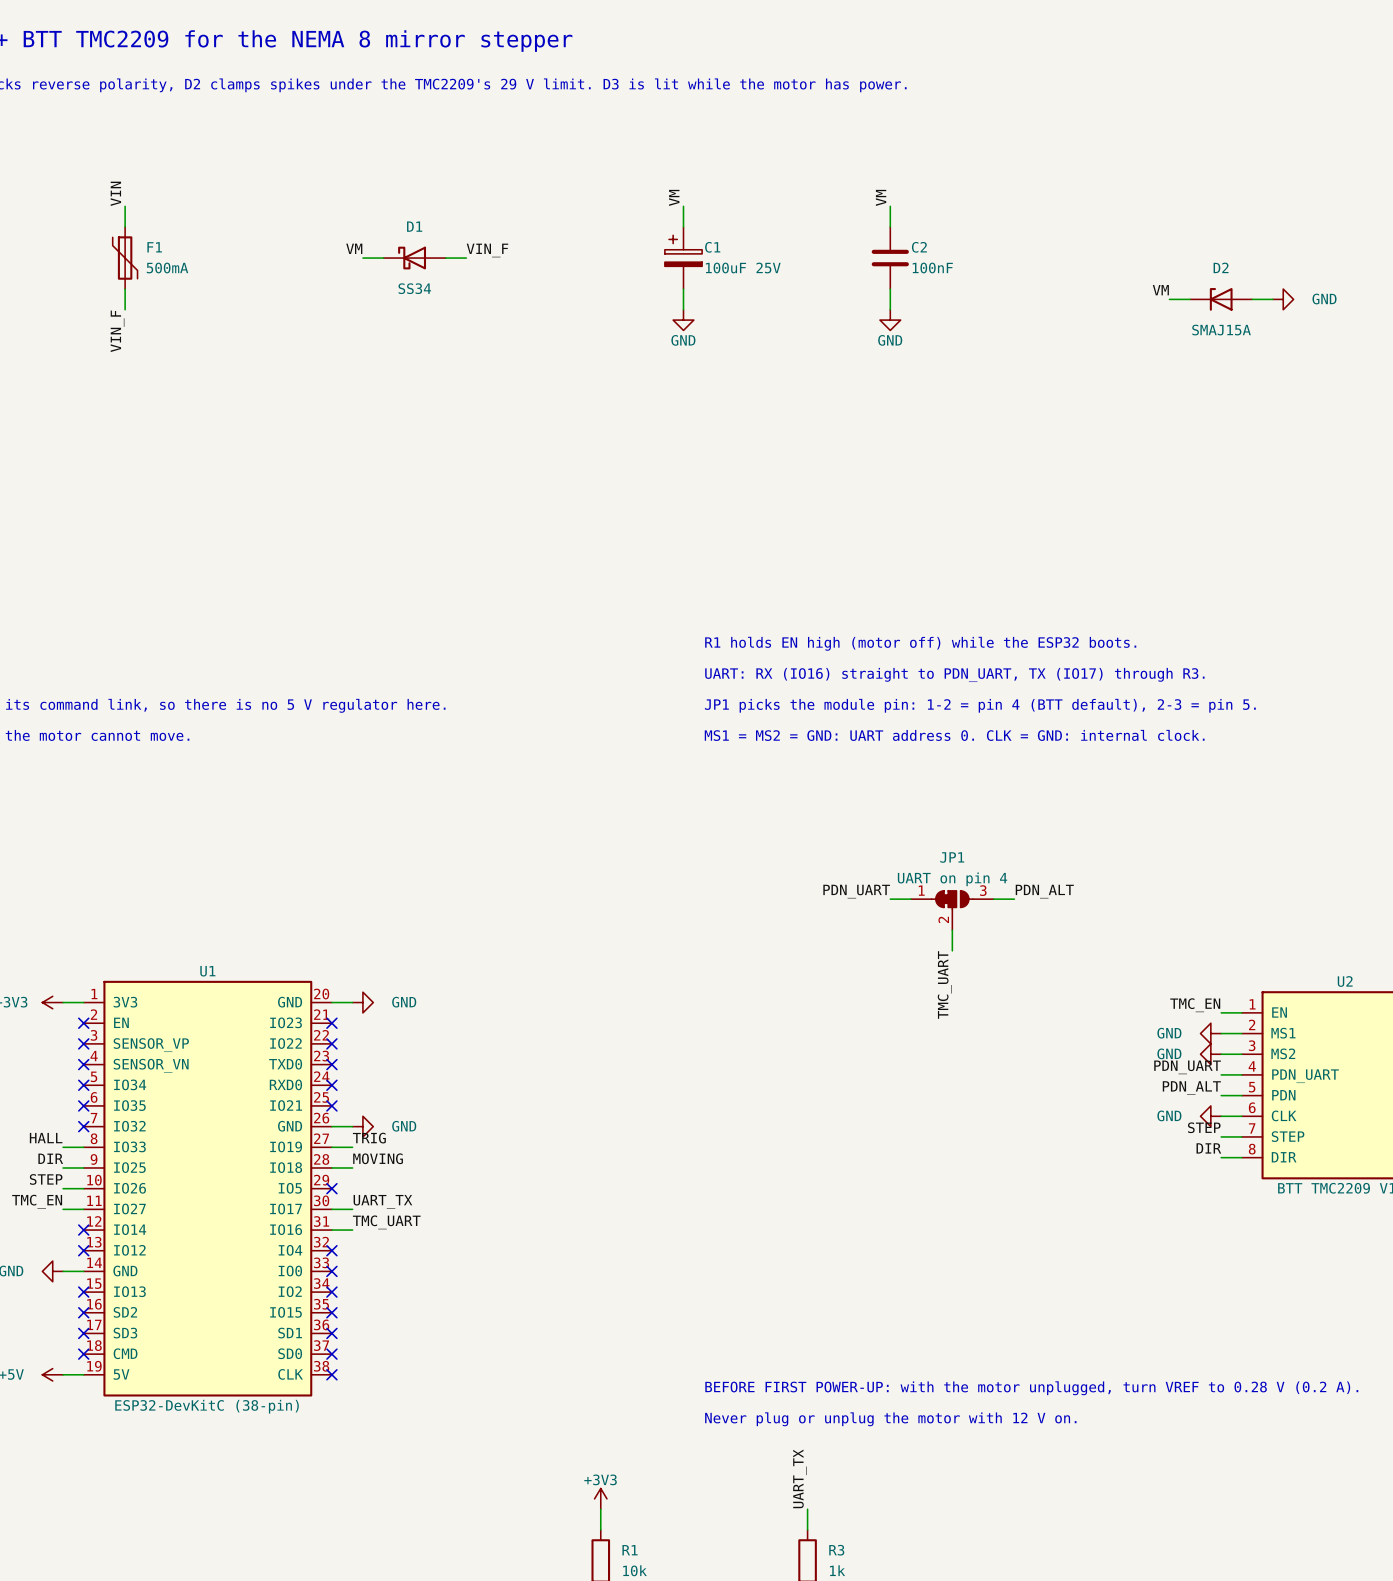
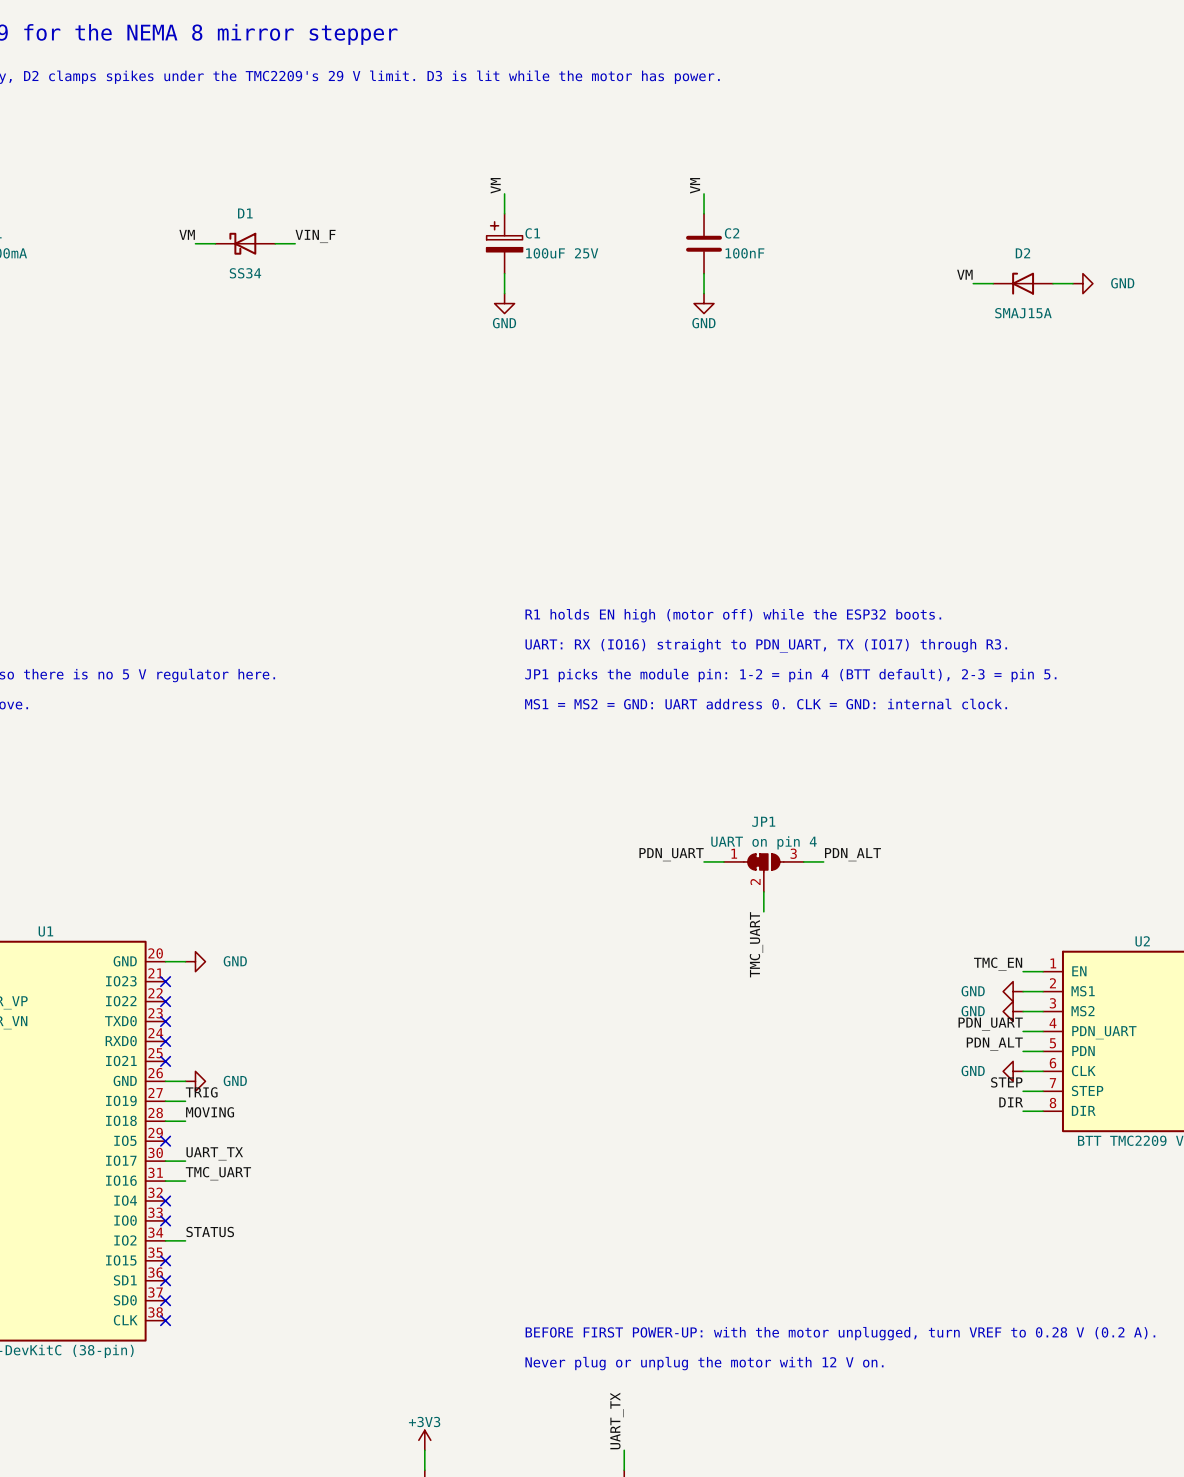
label: none -> STATUS (210, 1231)
wire: none -> (165, 1240) (185, 1240)
no-connect mark: (331, 1292) -> none

